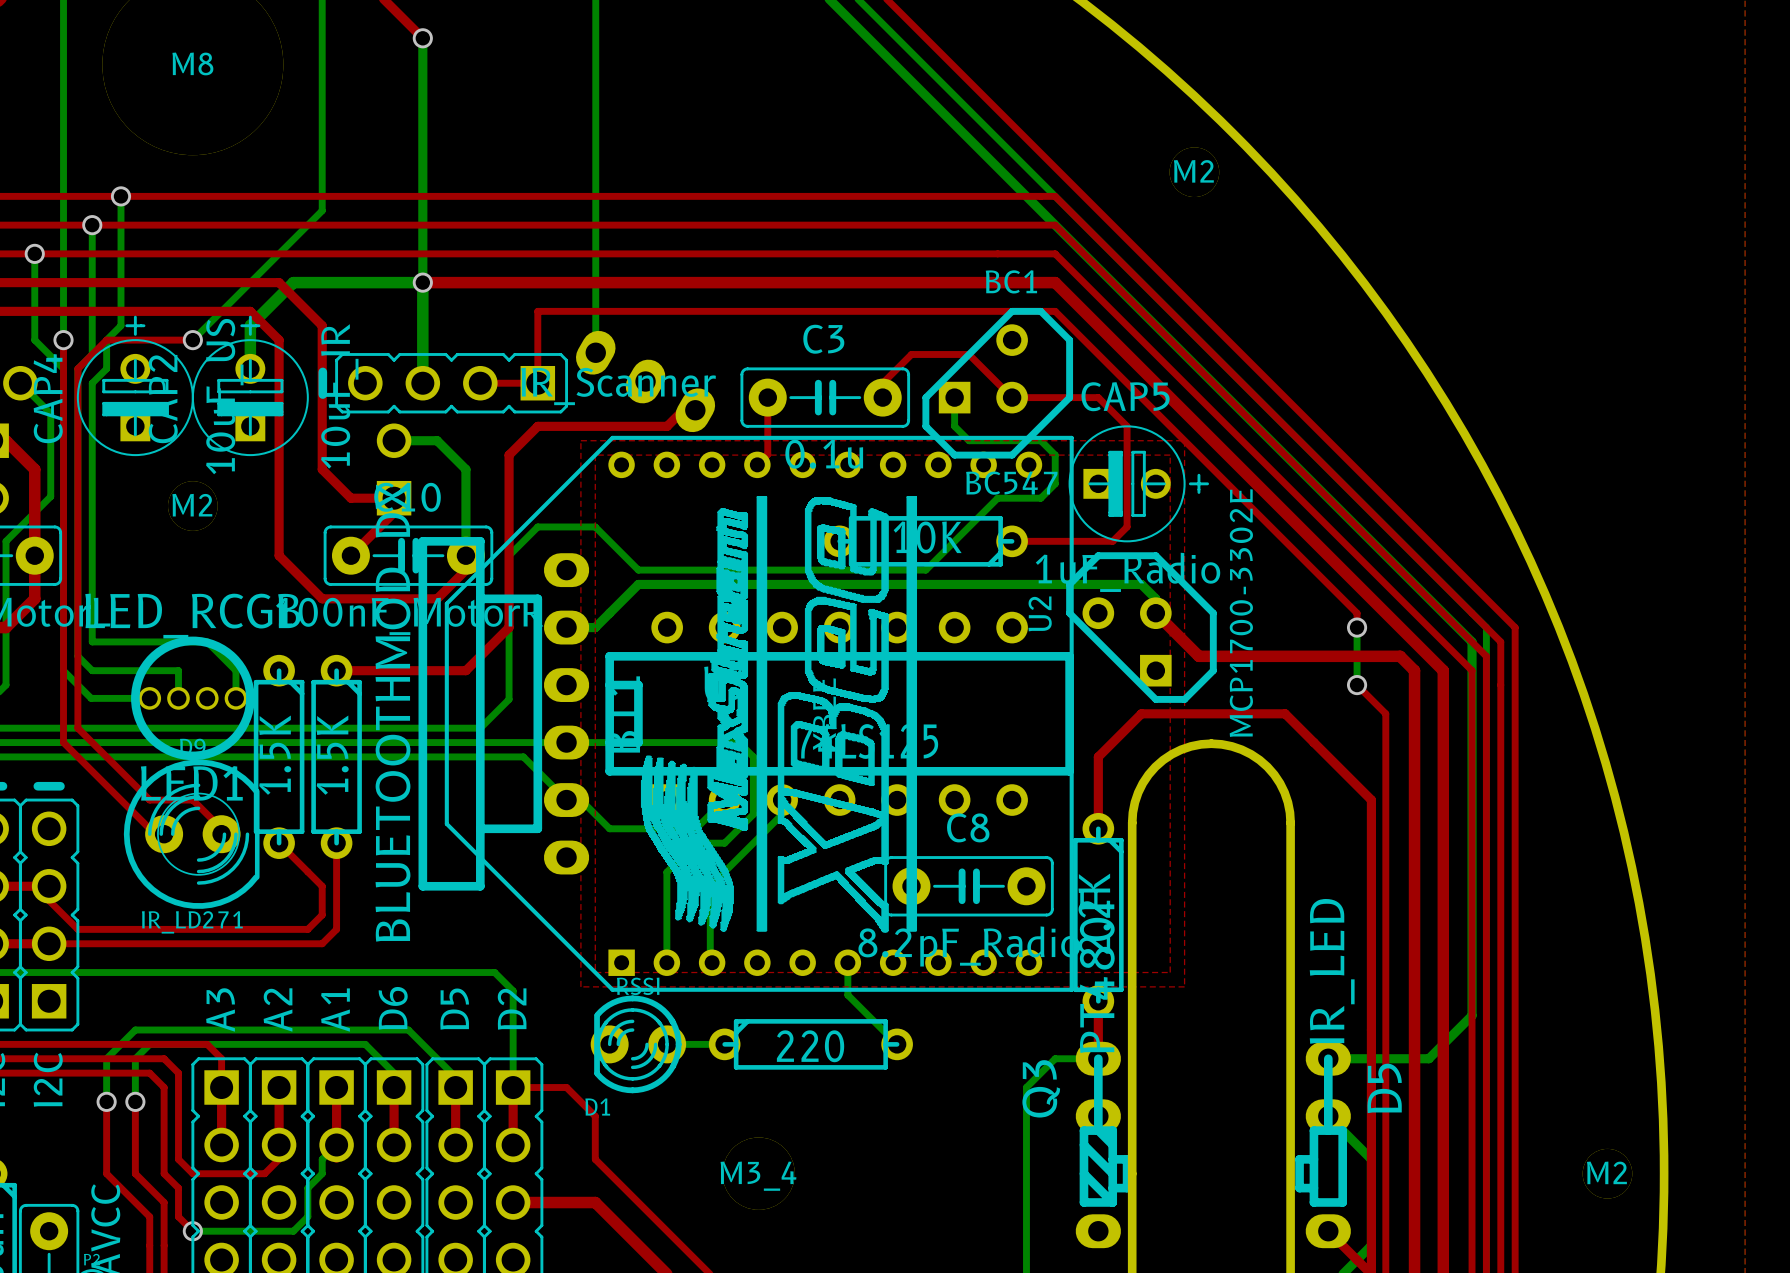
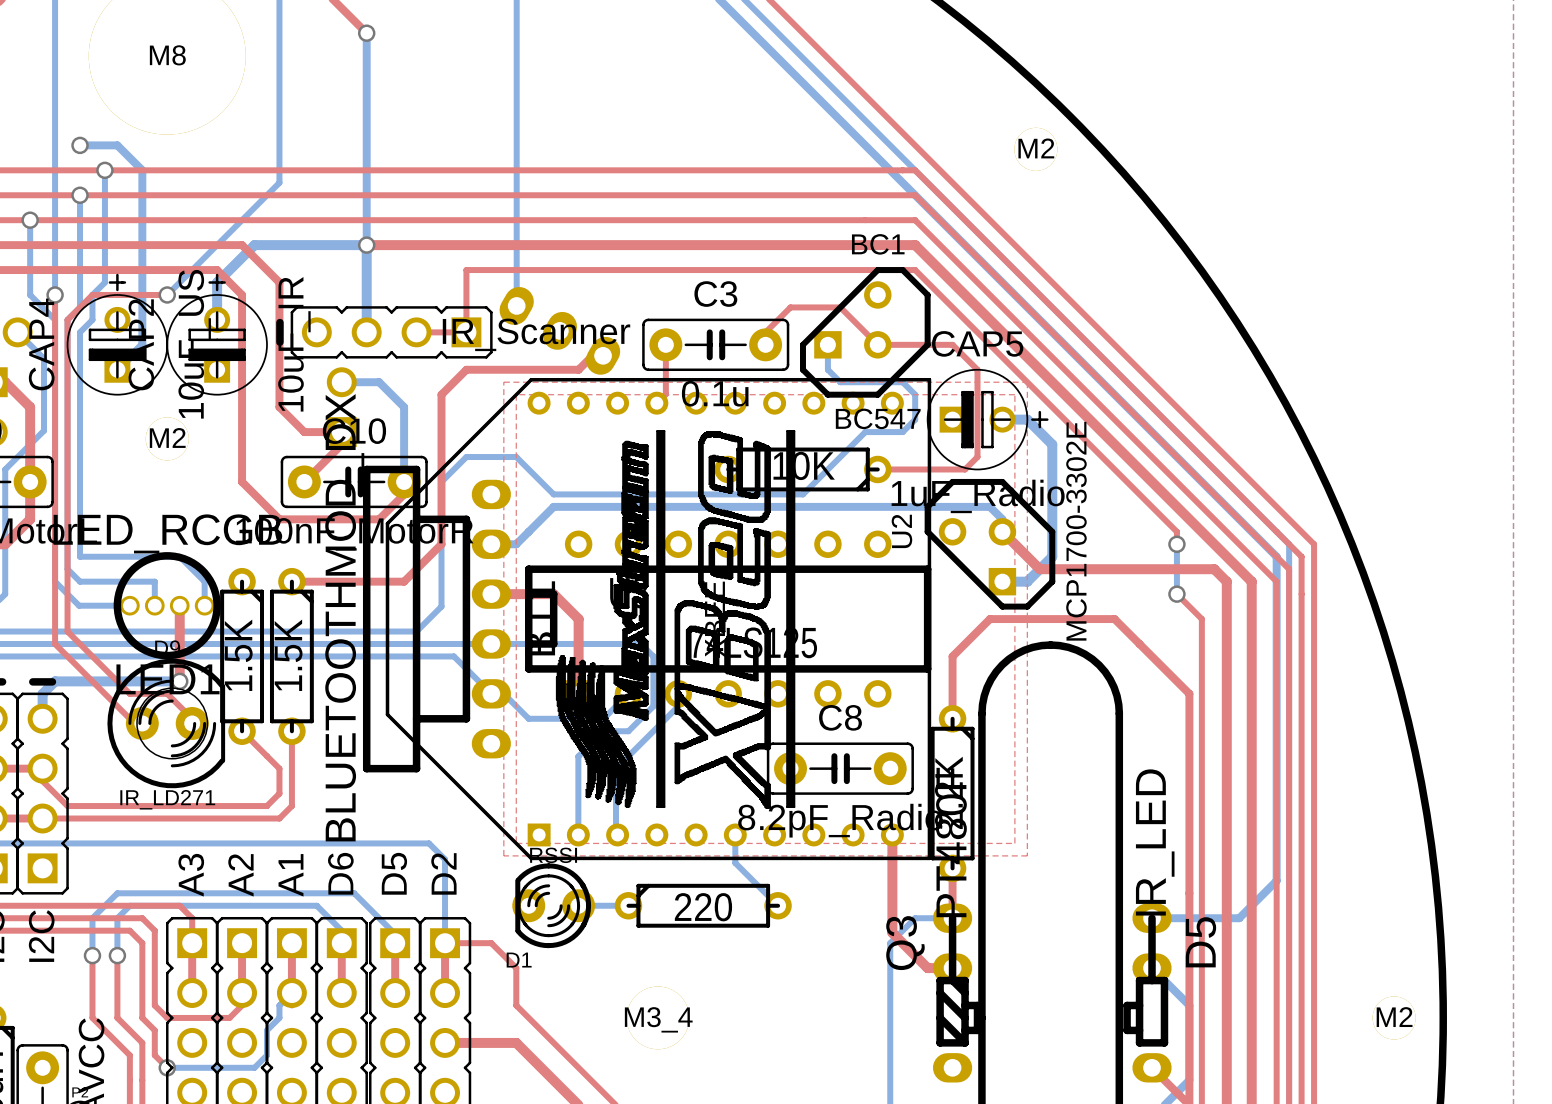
bottom track: none -> (80, 145) (117, 145) (142, 170) (142, 344) (117, 369)
via: none -> (80, 145)
bottom track: none -> (1002, 419) (1027, 419) (1052, 444) (1052, 556) (1027, 581) (1002, 581)
top track: none -> (491, 594) (553, 594) (578, 619) (578, 693)
top track: none -> (179, 605) (179, 681)
bottom track: none -> (179, 681) (55, 681) (42, 693) (42, 718)
via: none -> (179, 681)
top track: none -> (892, 834) (892, 932) (927, 968) (952, 968)

